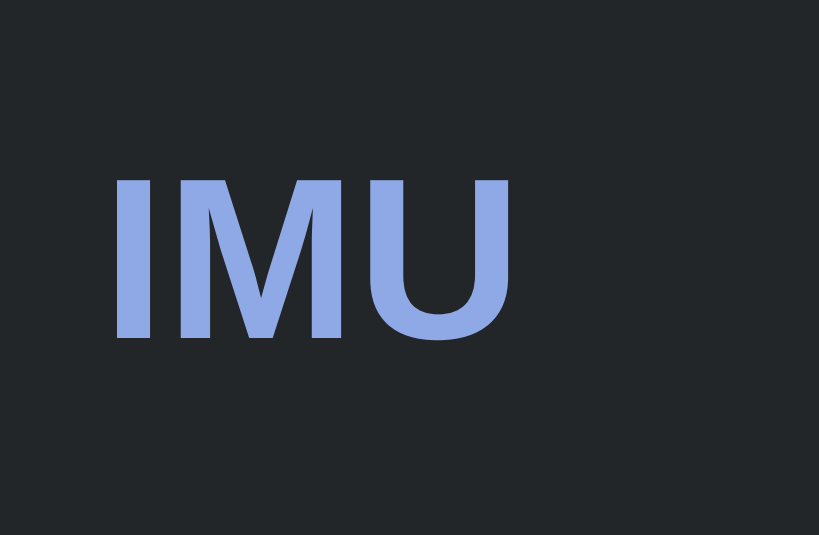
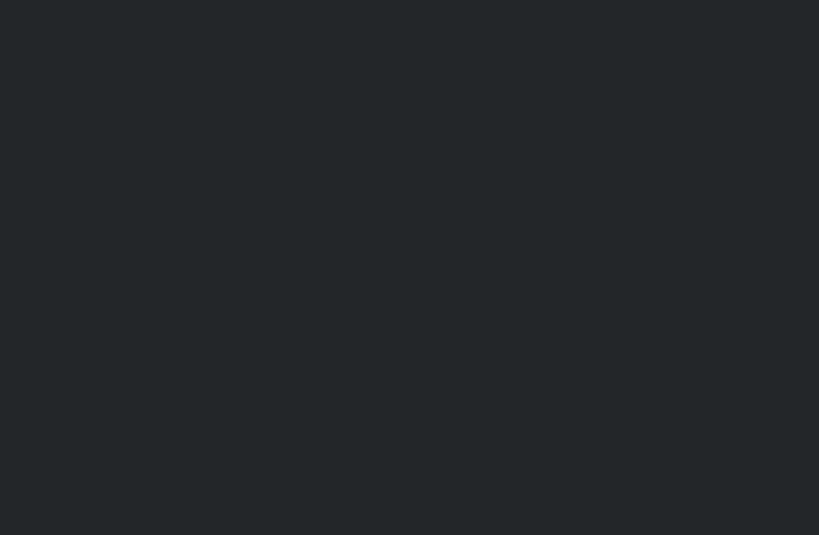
text: IMU (312, 260) -> none

